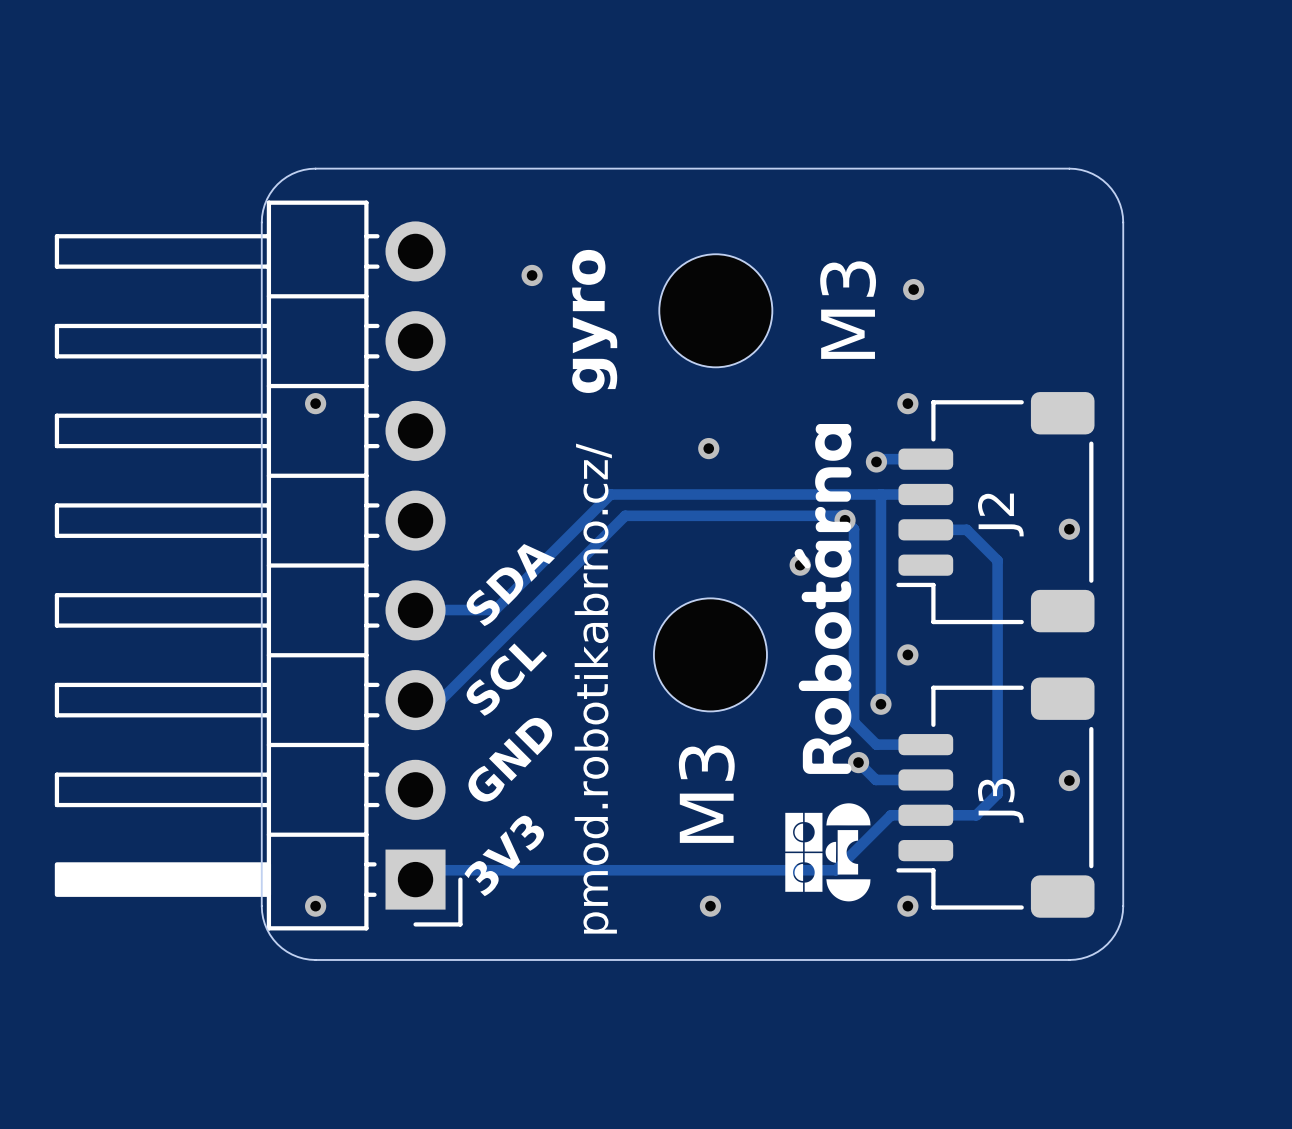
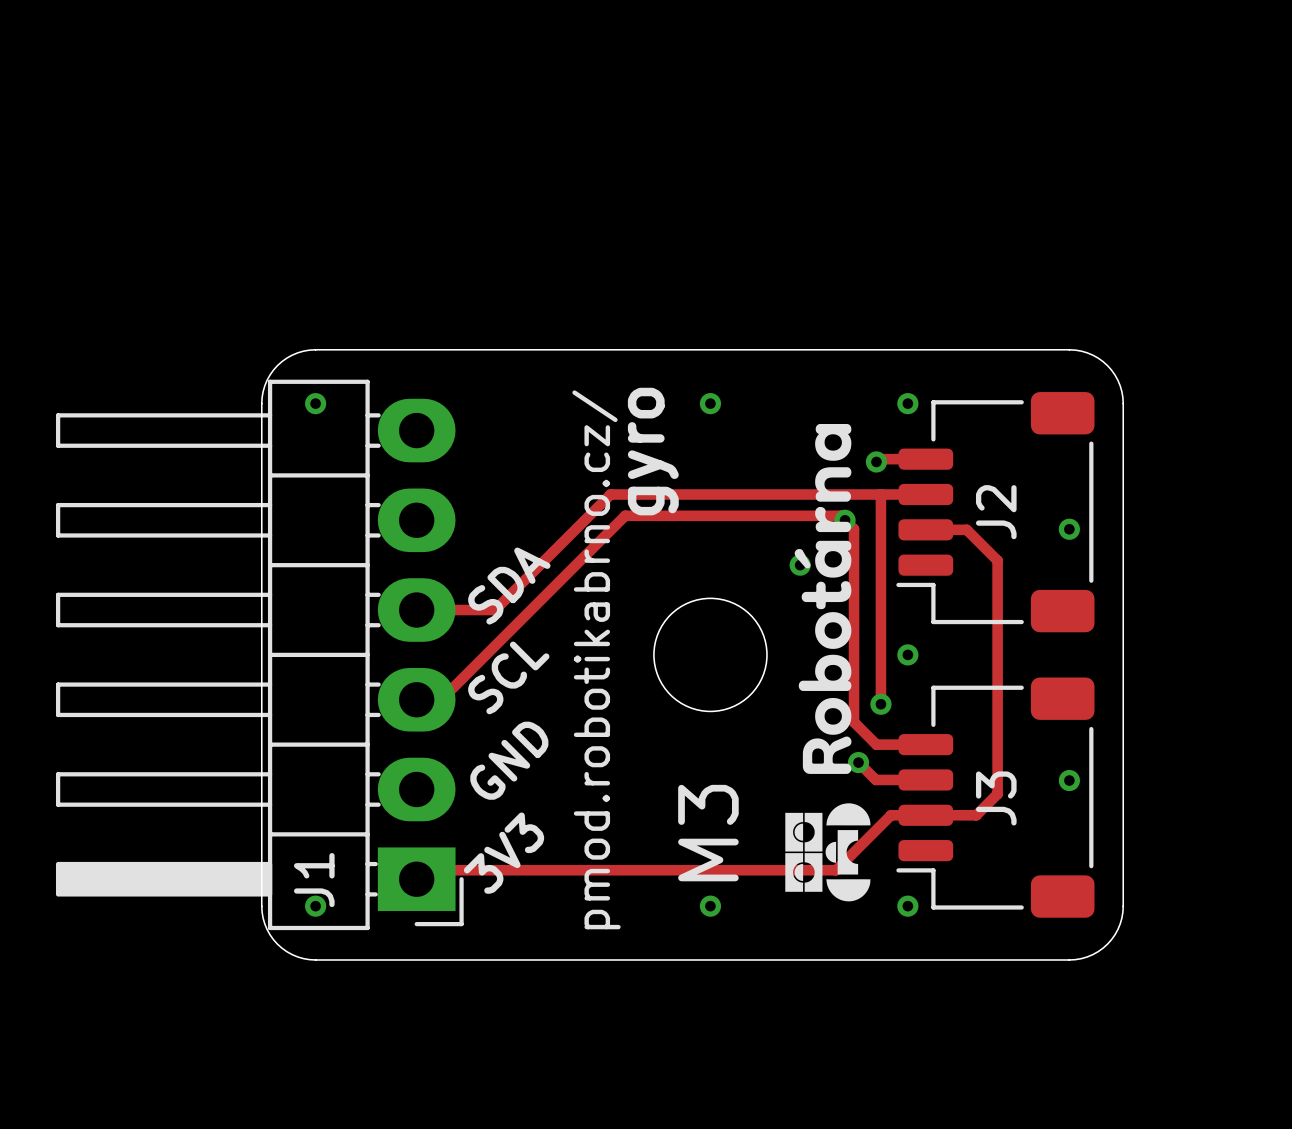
via: (532, 275) -> none
via: (913, 289) -> none
part: (715, 310) -> none
text: M3 (848, 310) -> none
text position: gyro (594, 321) -> gyro (653, 451)
board edge: (261, 403) (263, 210) (270, 193) (282, 180) (297, 171) (315, 168) (1069, 168) (1087, 171) (1098, 176) (1111, 188) (1117, 199) (1122, 216) (1123, 403) -> (261, 403) (264, 385) (277, 365) (297, 352) (315, 349) (1075, 350) (1092, 355) (1107, 365) (1120, 385) (1123, 403)
via position: (708, 448) -> (710, 403)
part: (258, 565) -> none
J1: none -> (259, 654)
text position: M3 (706, 794) -> M3 (708, 833)

